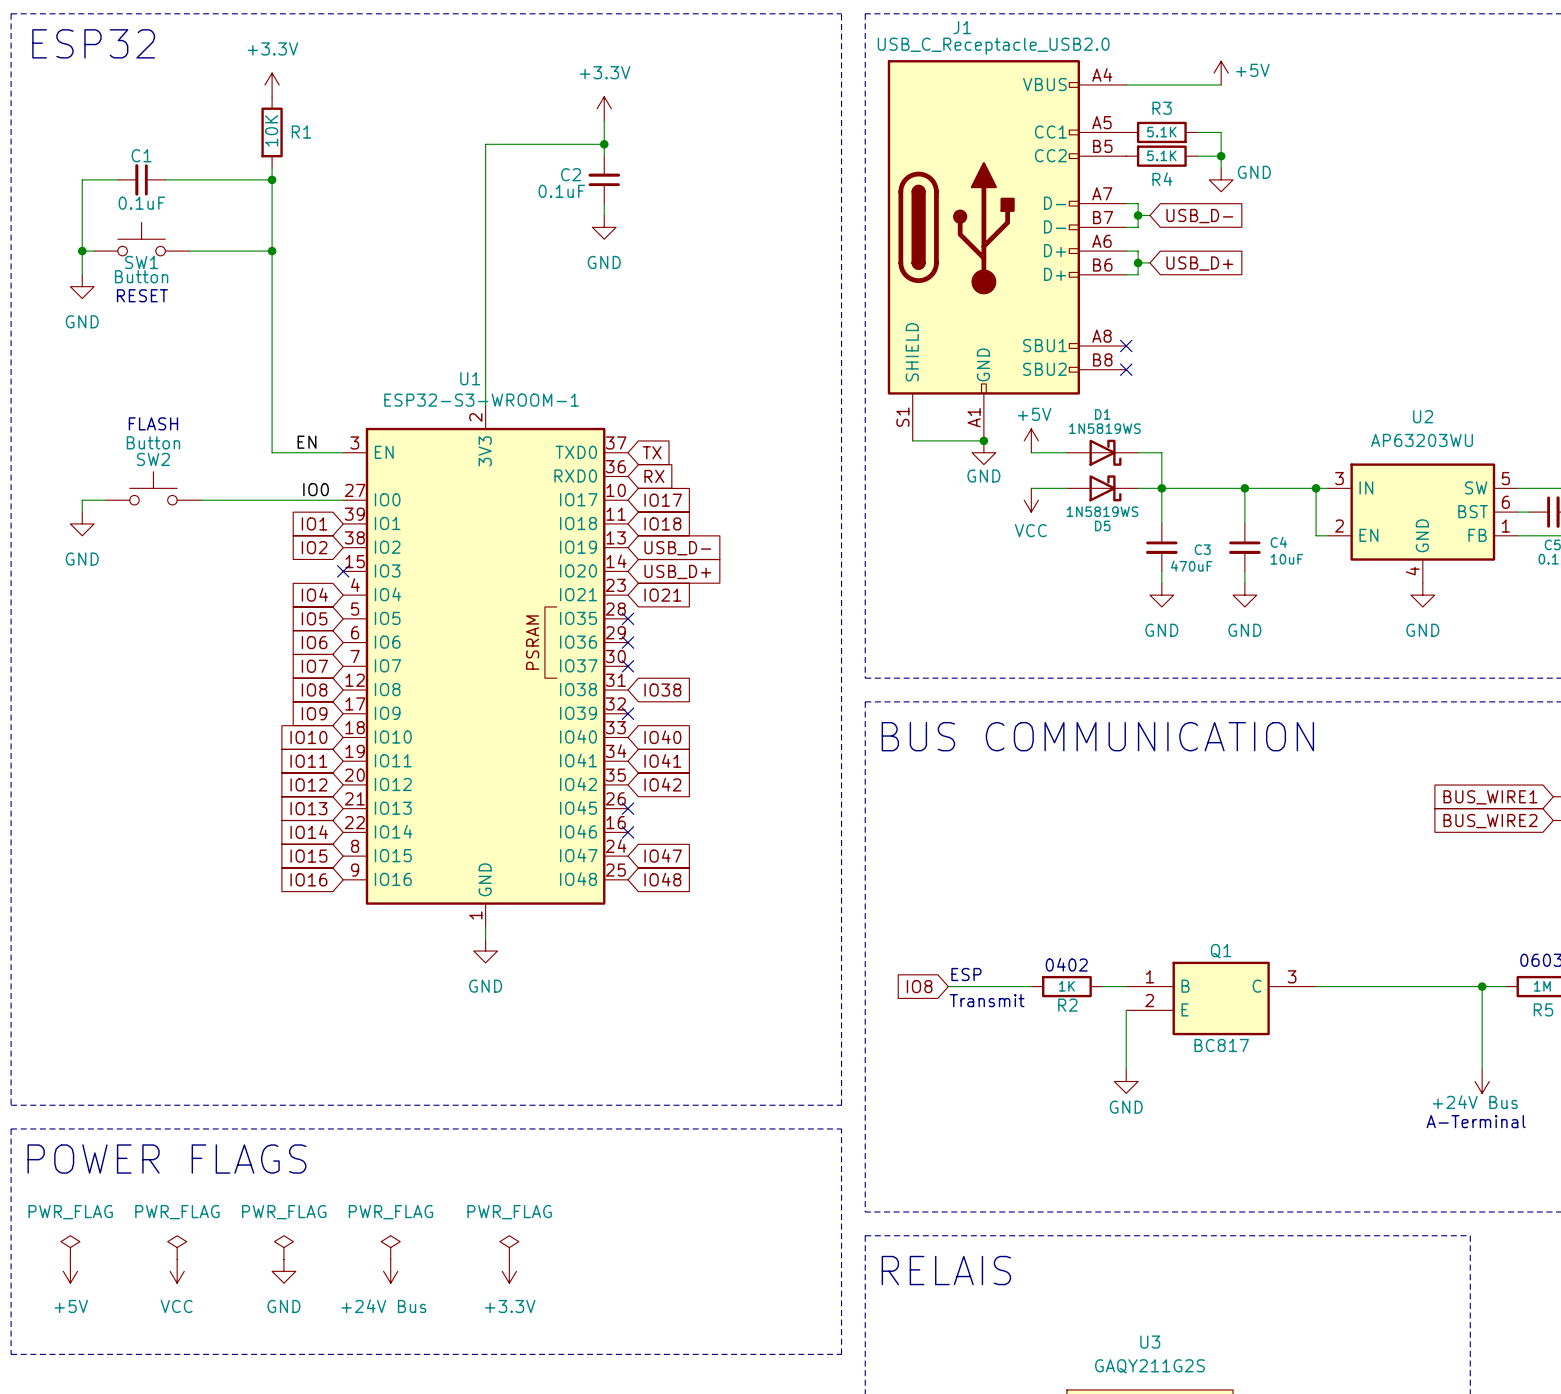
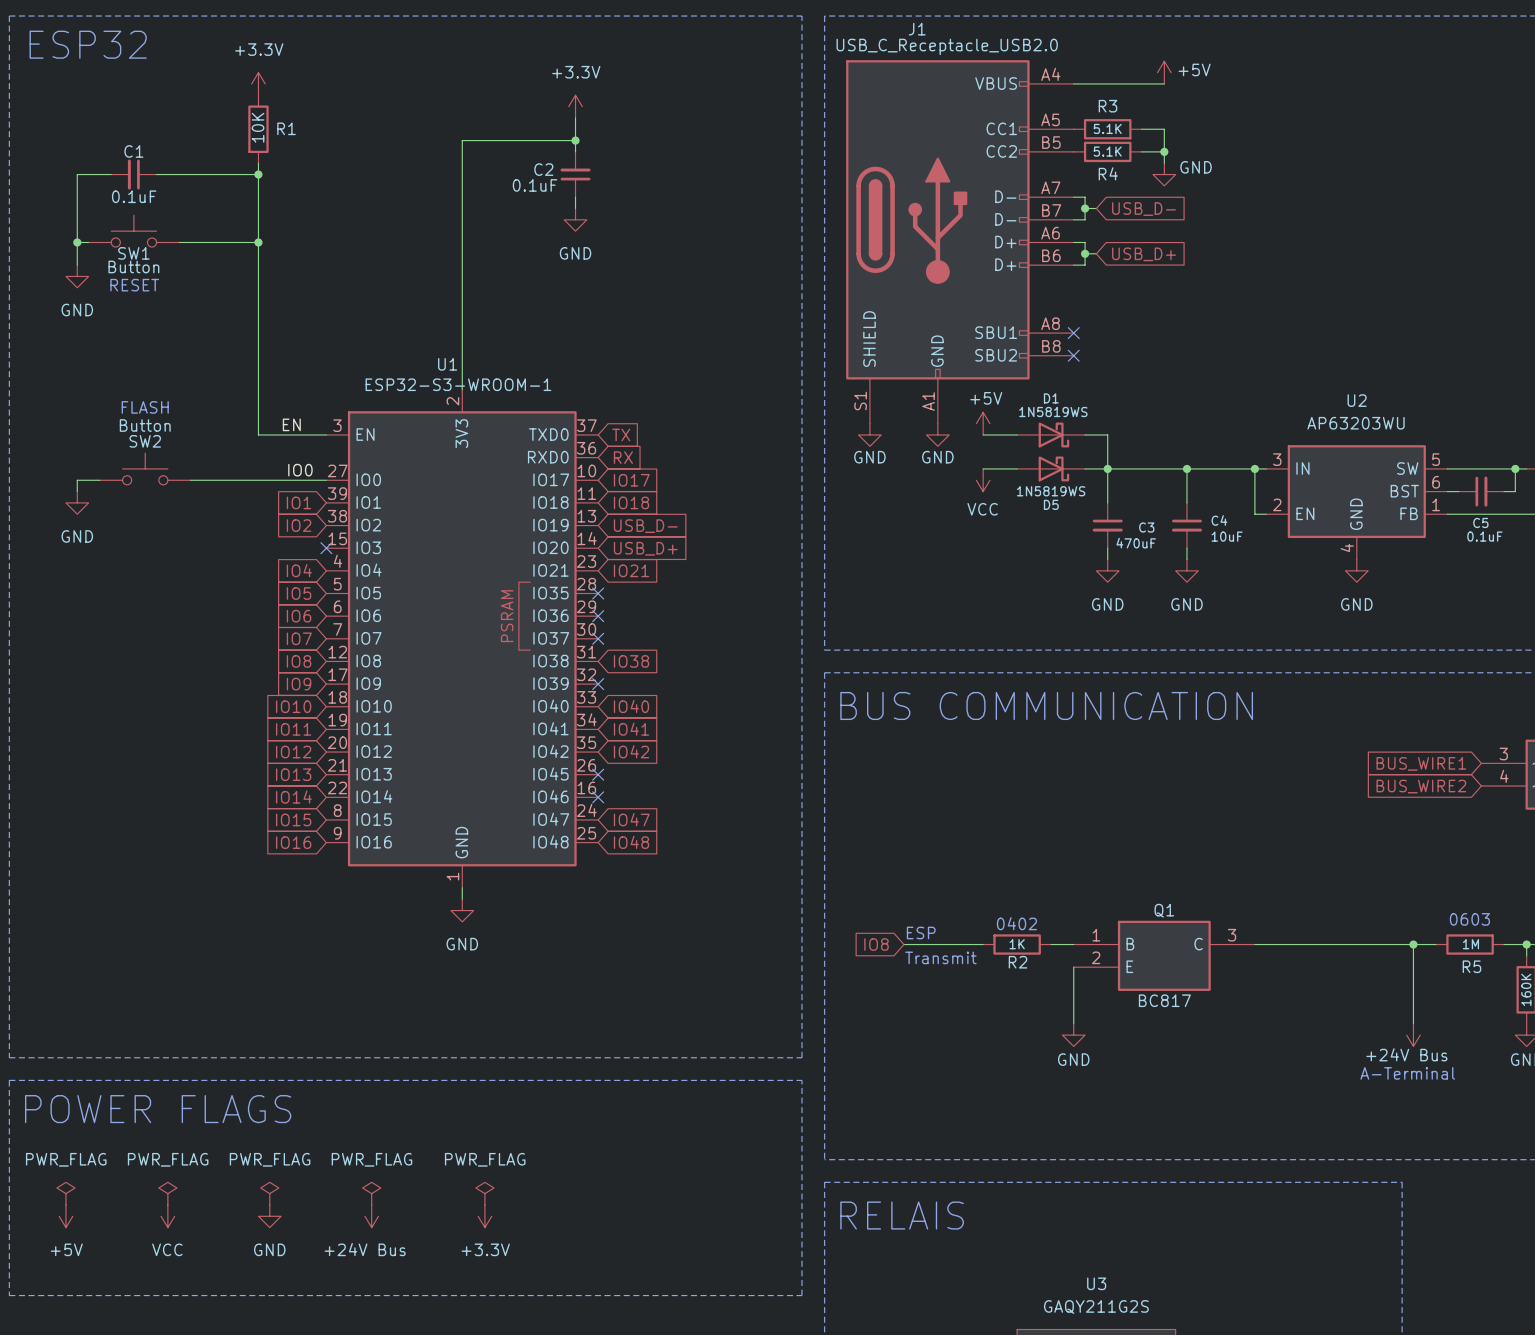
wire: (912, 440) (983, 440) -> none
junction: (983, 440) -> none
power symbol: none -> GND (869, 434)

